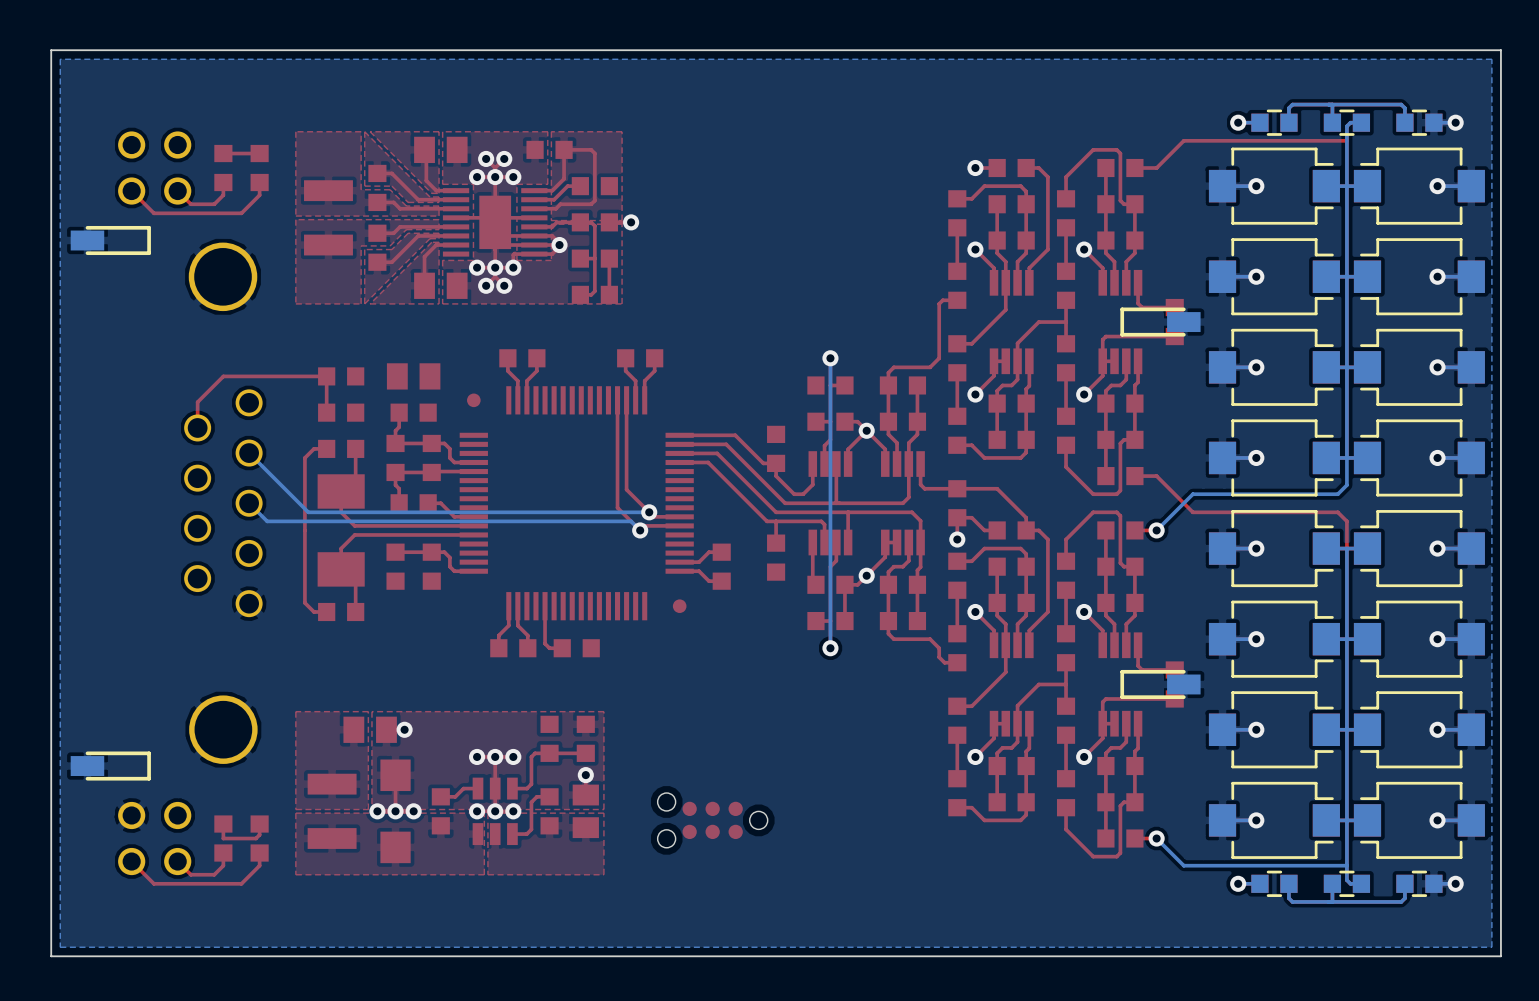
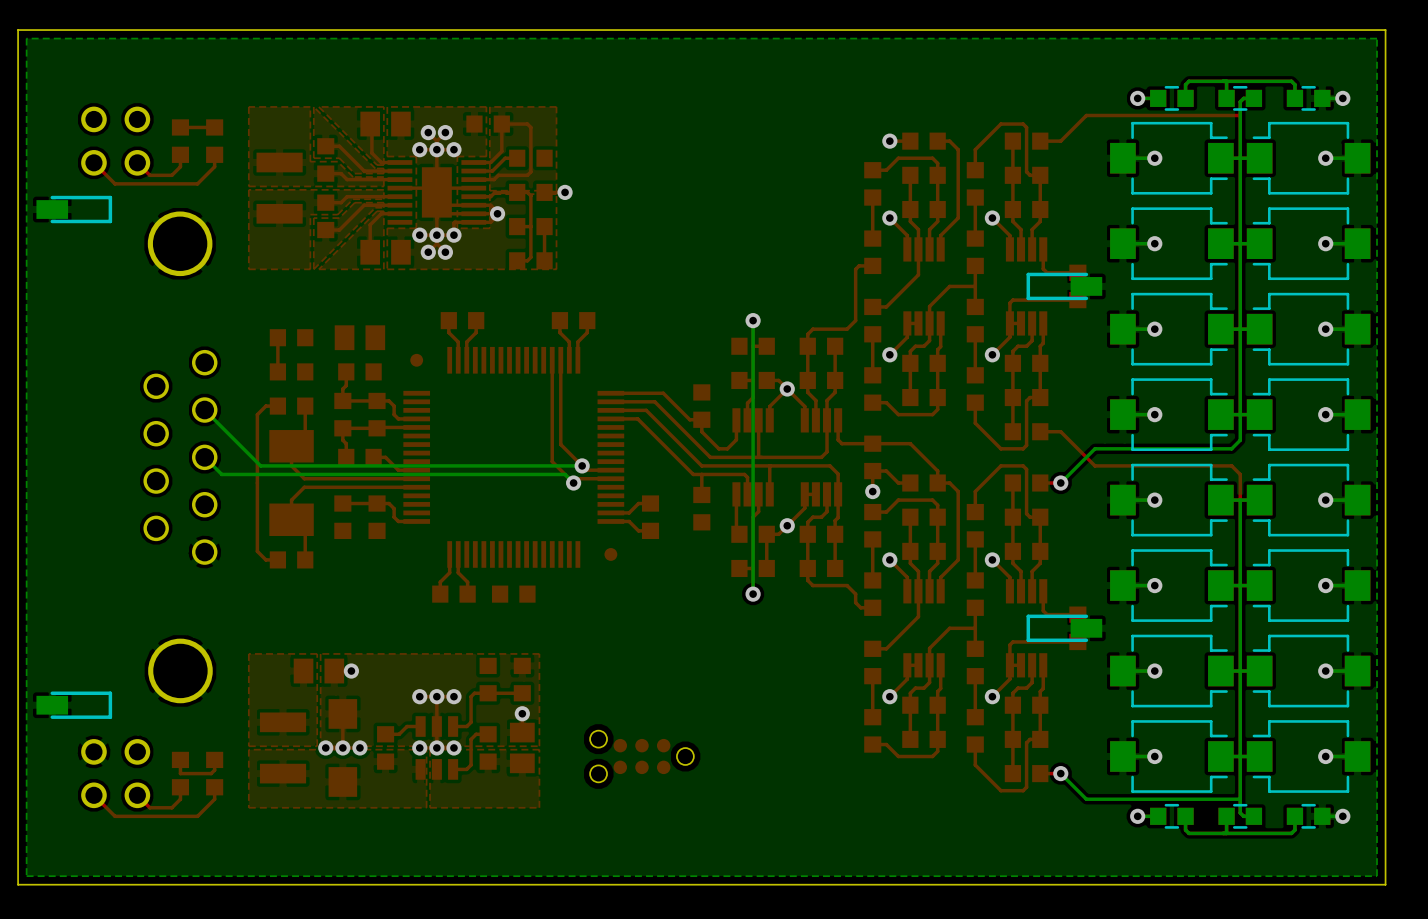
top track: (326, 376) (223, 376) (197, 402) (197, 427) -> none
top track: (545, 606) (545, 643) (549, 648) (562, 648) -> none

